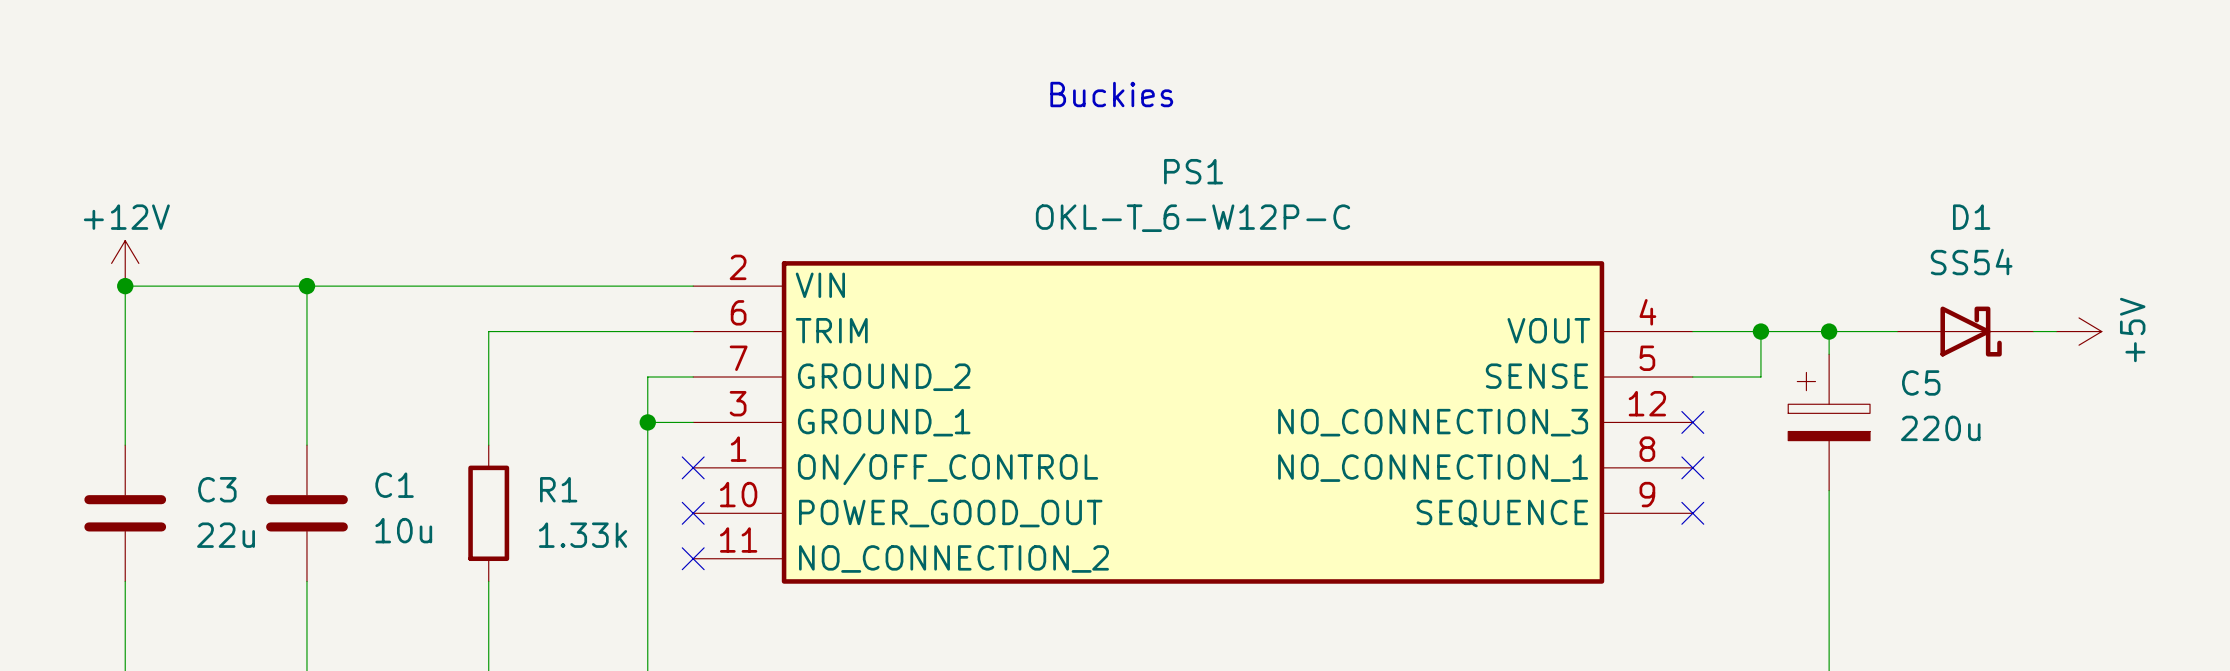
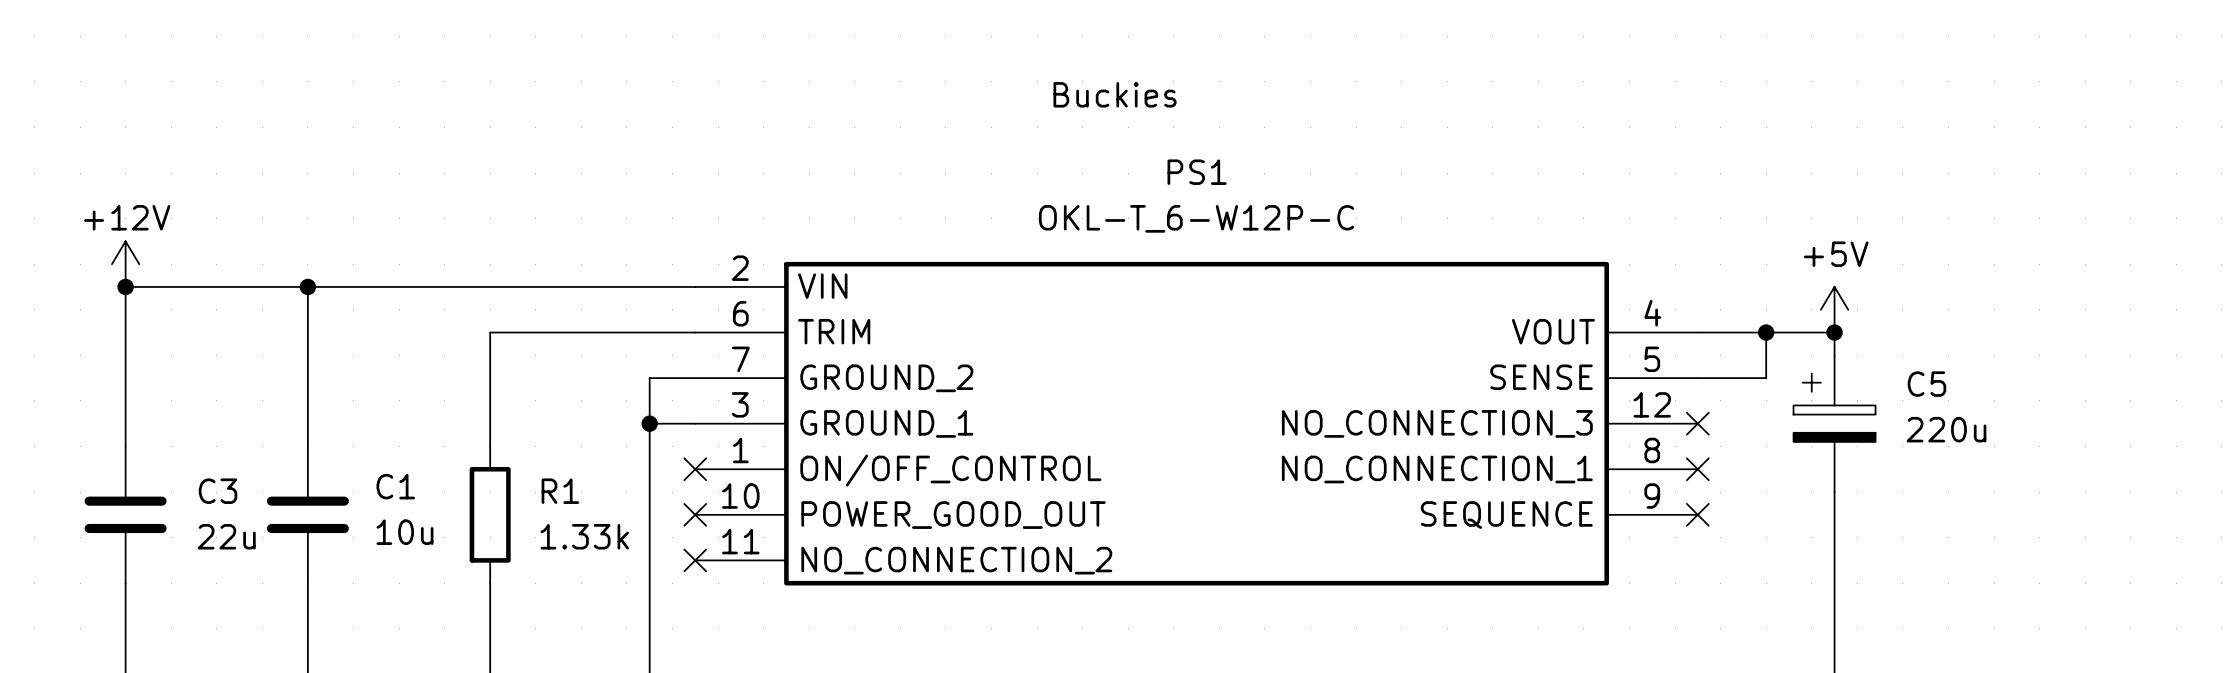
wire: (1829, 331) (1897, 331) -> none
D1: SS54 (1965, 331) -> none
wire: (2033, 331) (2056, 331) -> none
power symbol rotation: 0° (2079, 331) -> 90° counterclockwise (1834, 309)
power symbol position: +5V (2079, 331) -> +5V (1834, 309)

